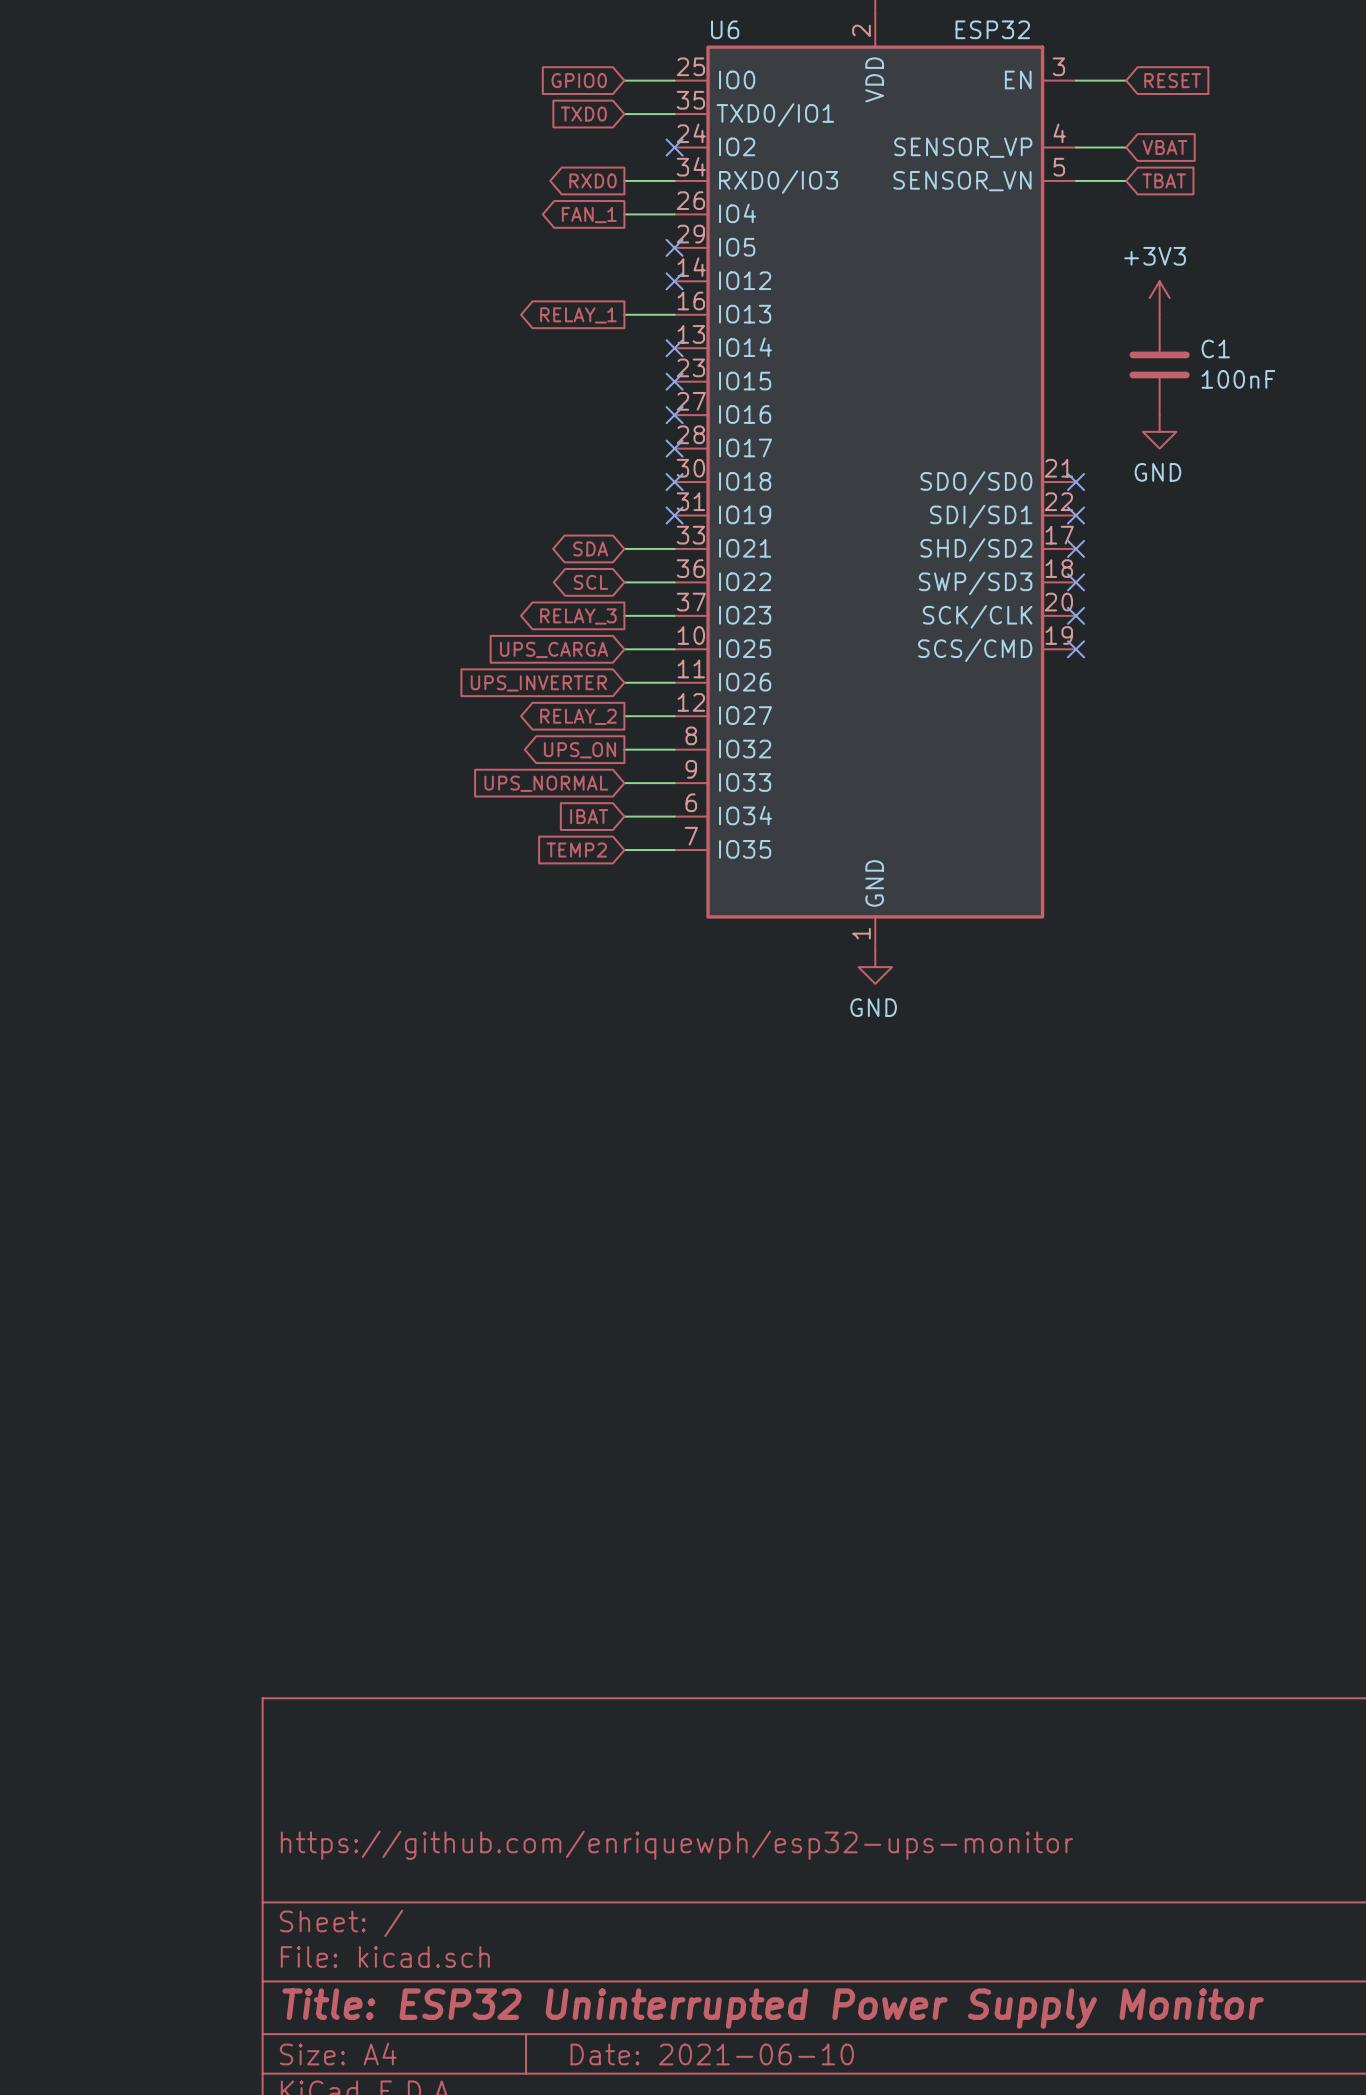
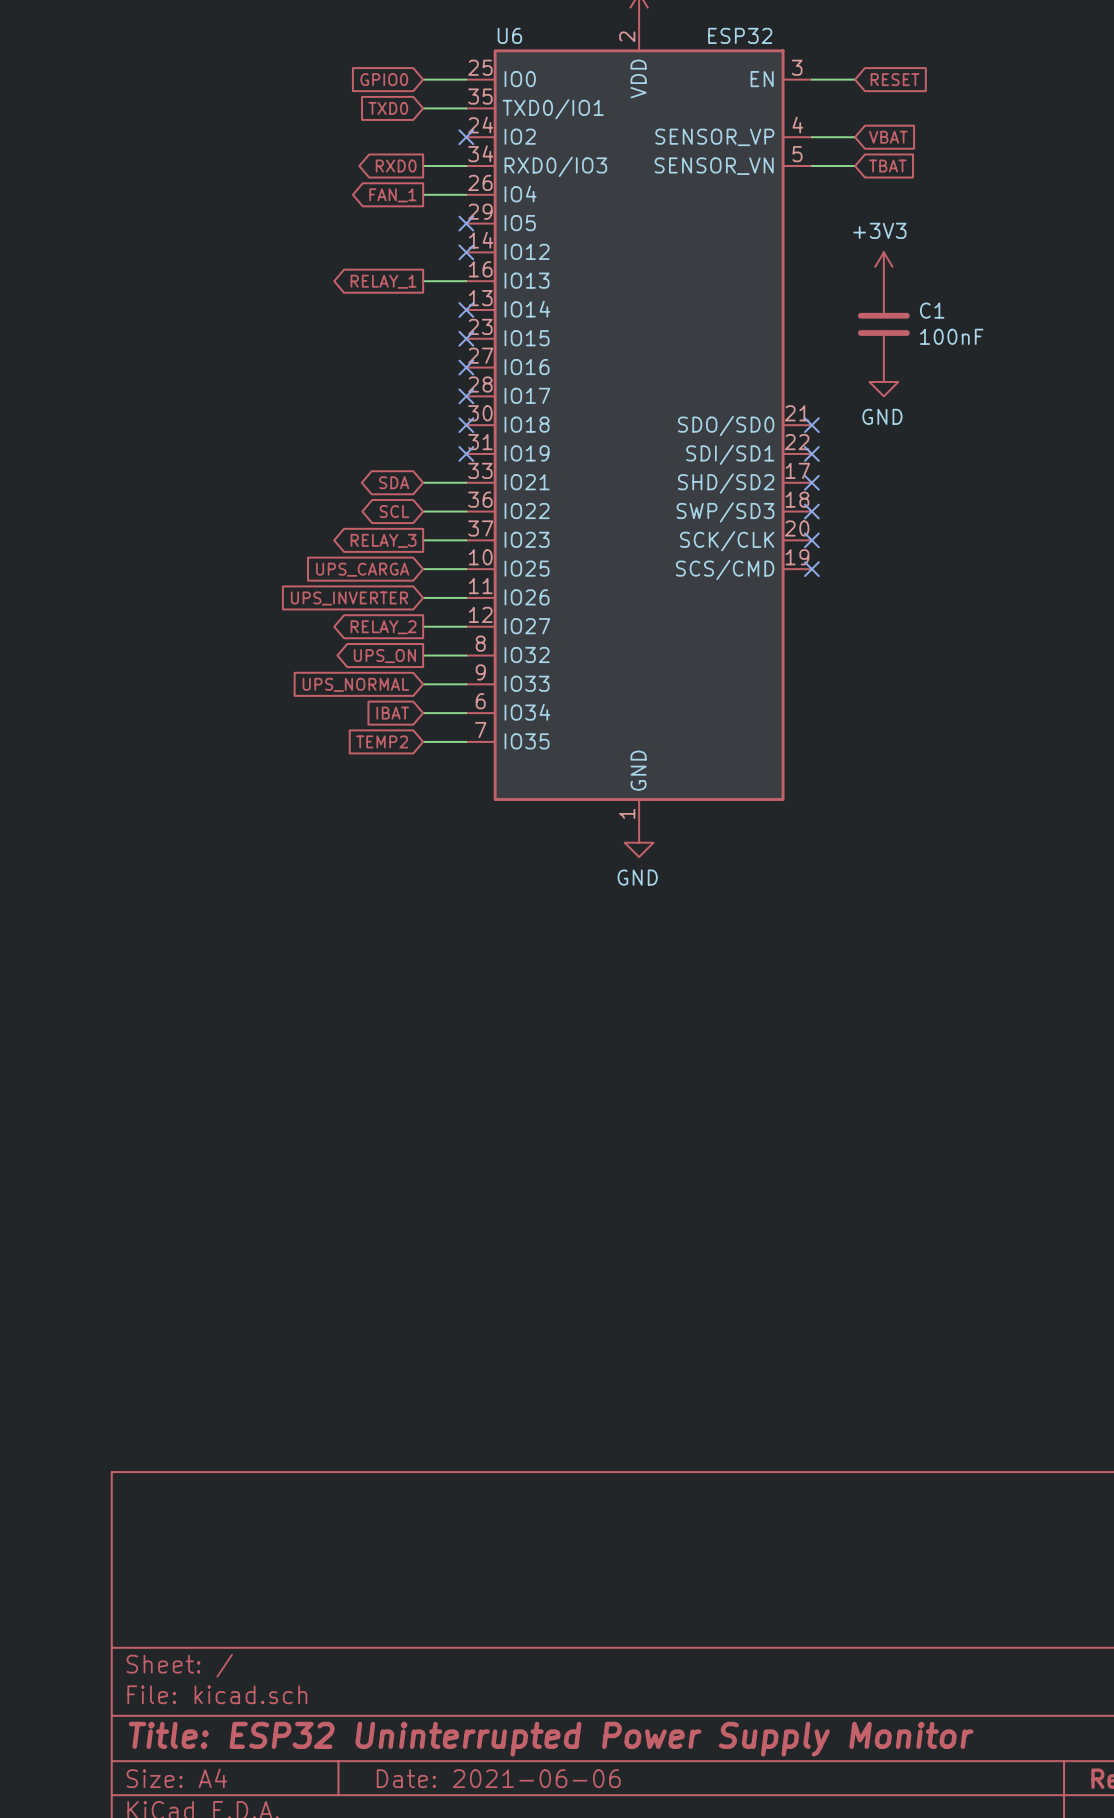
title block: https://github.com/enriquewph/esp32-ups-monitor (676, 1845) -> none
title block: Date: 2021-06-10 (712, 2054) -> Date: 2021-06-06 (498, 1778)

